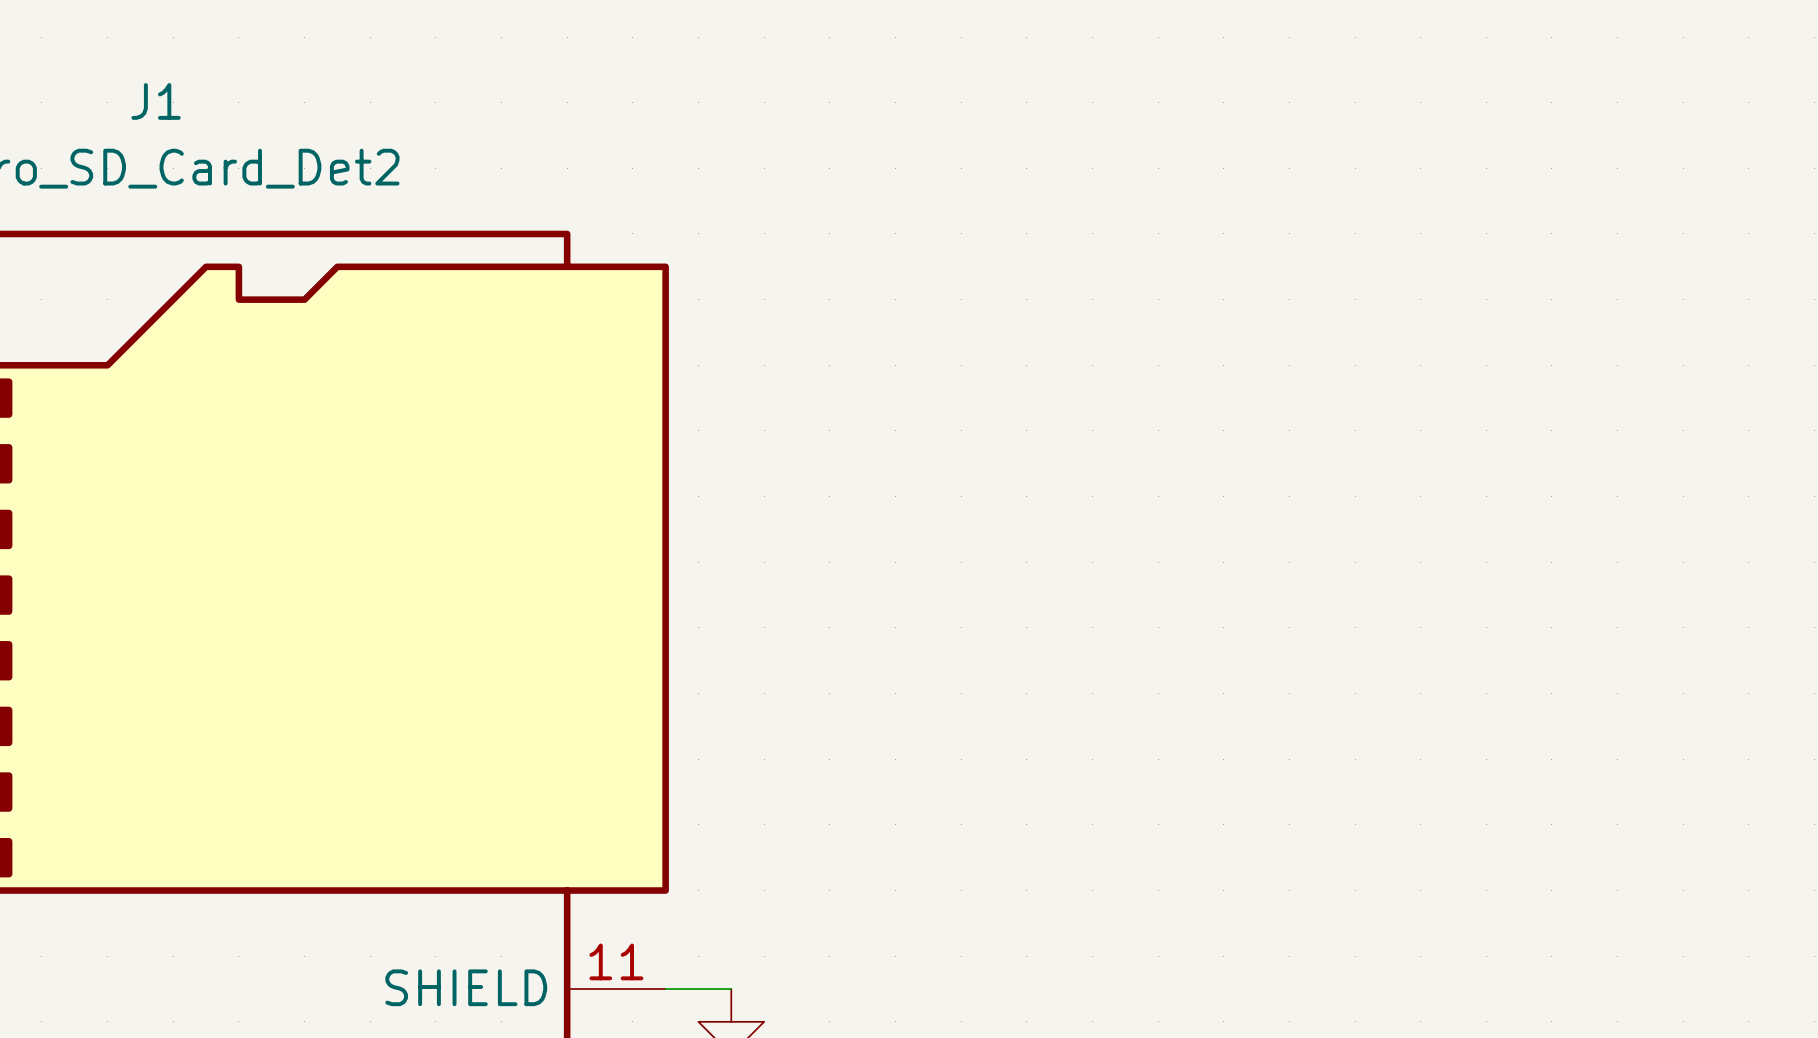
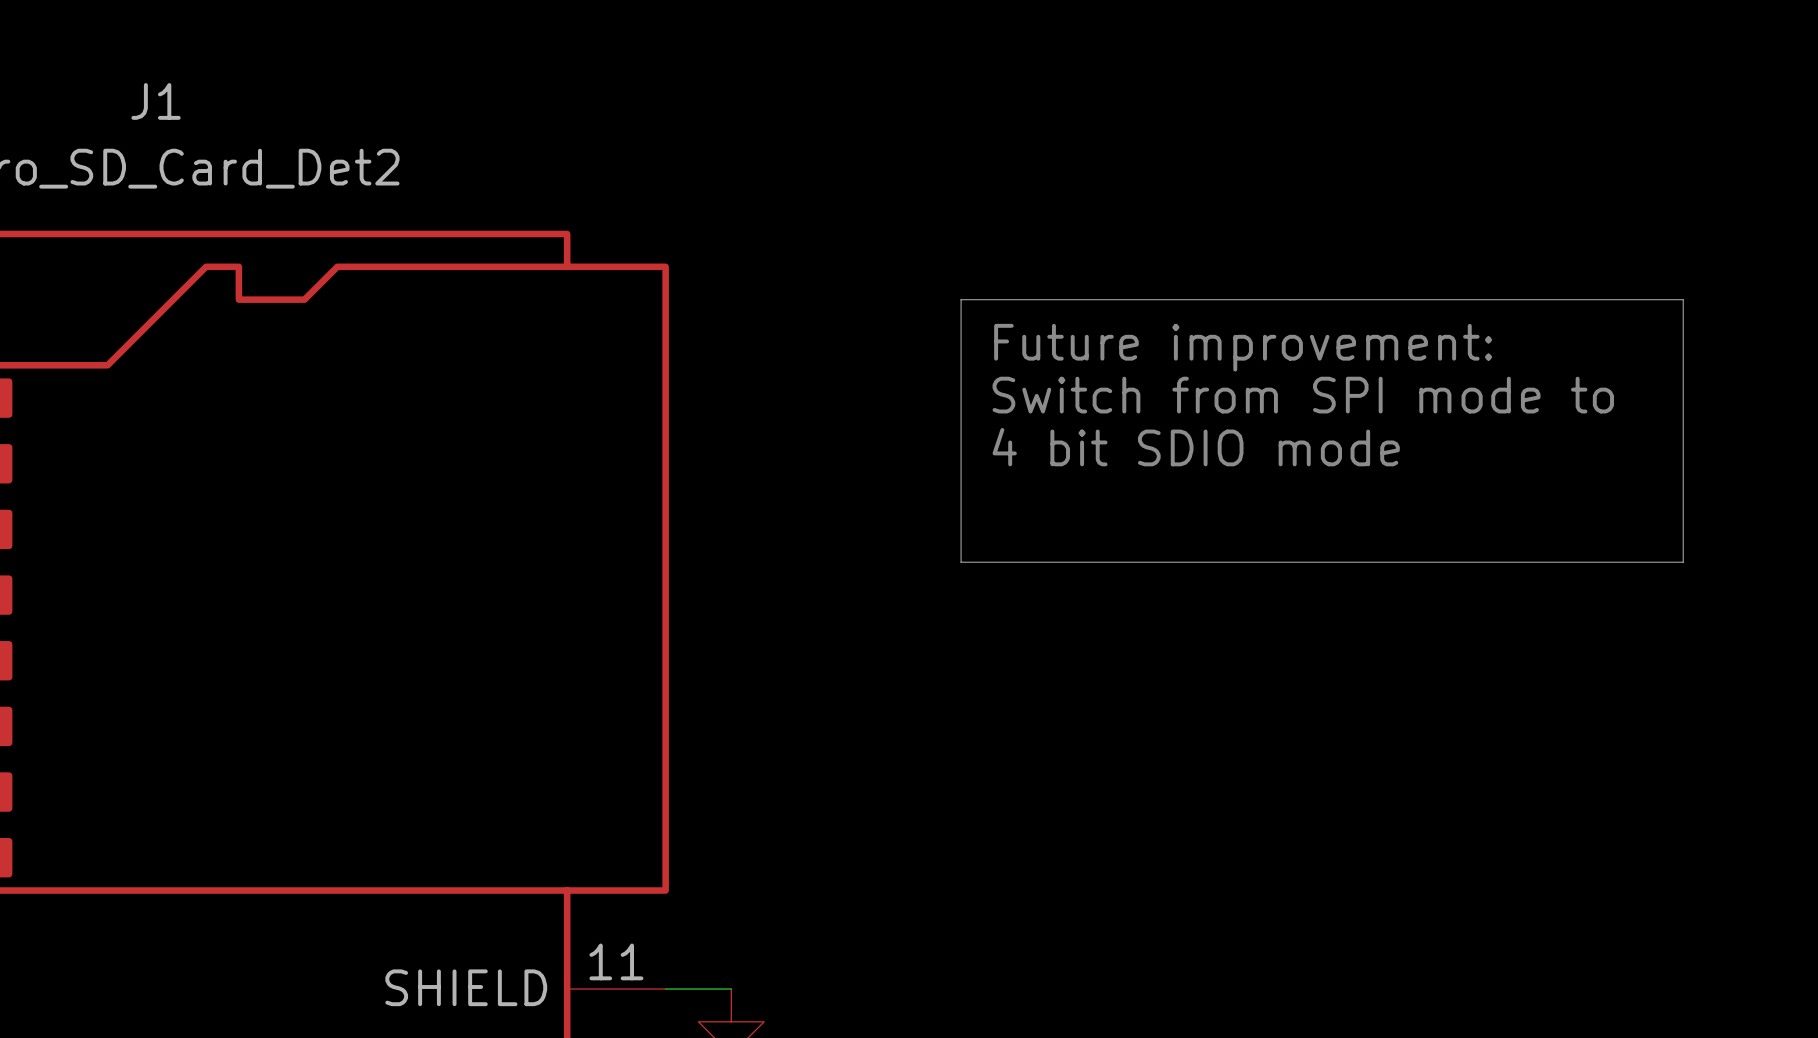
line: none -> (961, 299) (1683, 299) (1683, 562) (961, 562) (961, 299)
text: none -> Future improvement: (1243, 347)
text: none -> Switch from SPI mode to (1303, 395)
text: none -> 4 bit SDIO mode (1196, 447)

